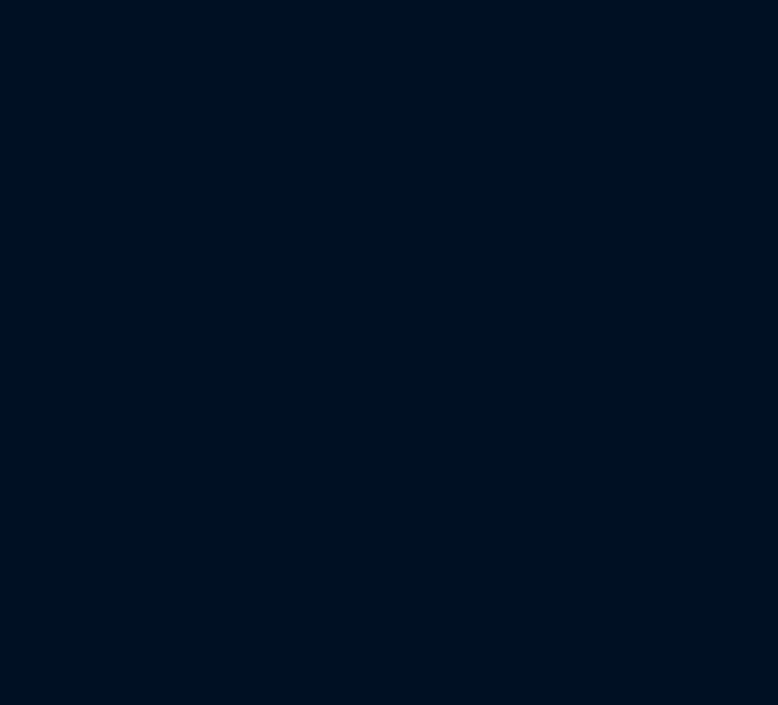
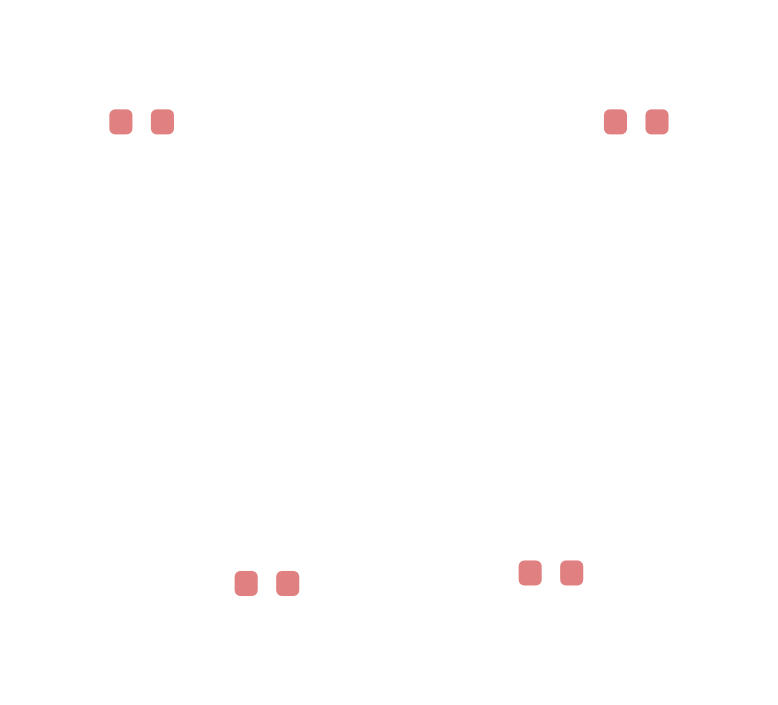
part: none -> (141, 121)
part: none -> (636, 121)
part: none -> (550, 572)
part: none -> (266, 583)

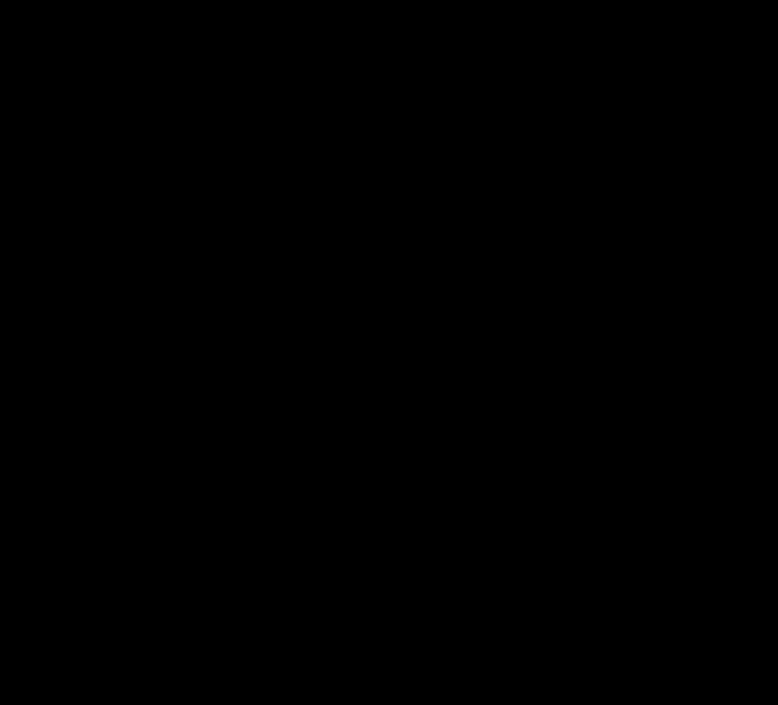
part: (141, 121) -> none
part: (636, 121) -> none
part: (550, 572) -> none
part: (266, 583) -> none

